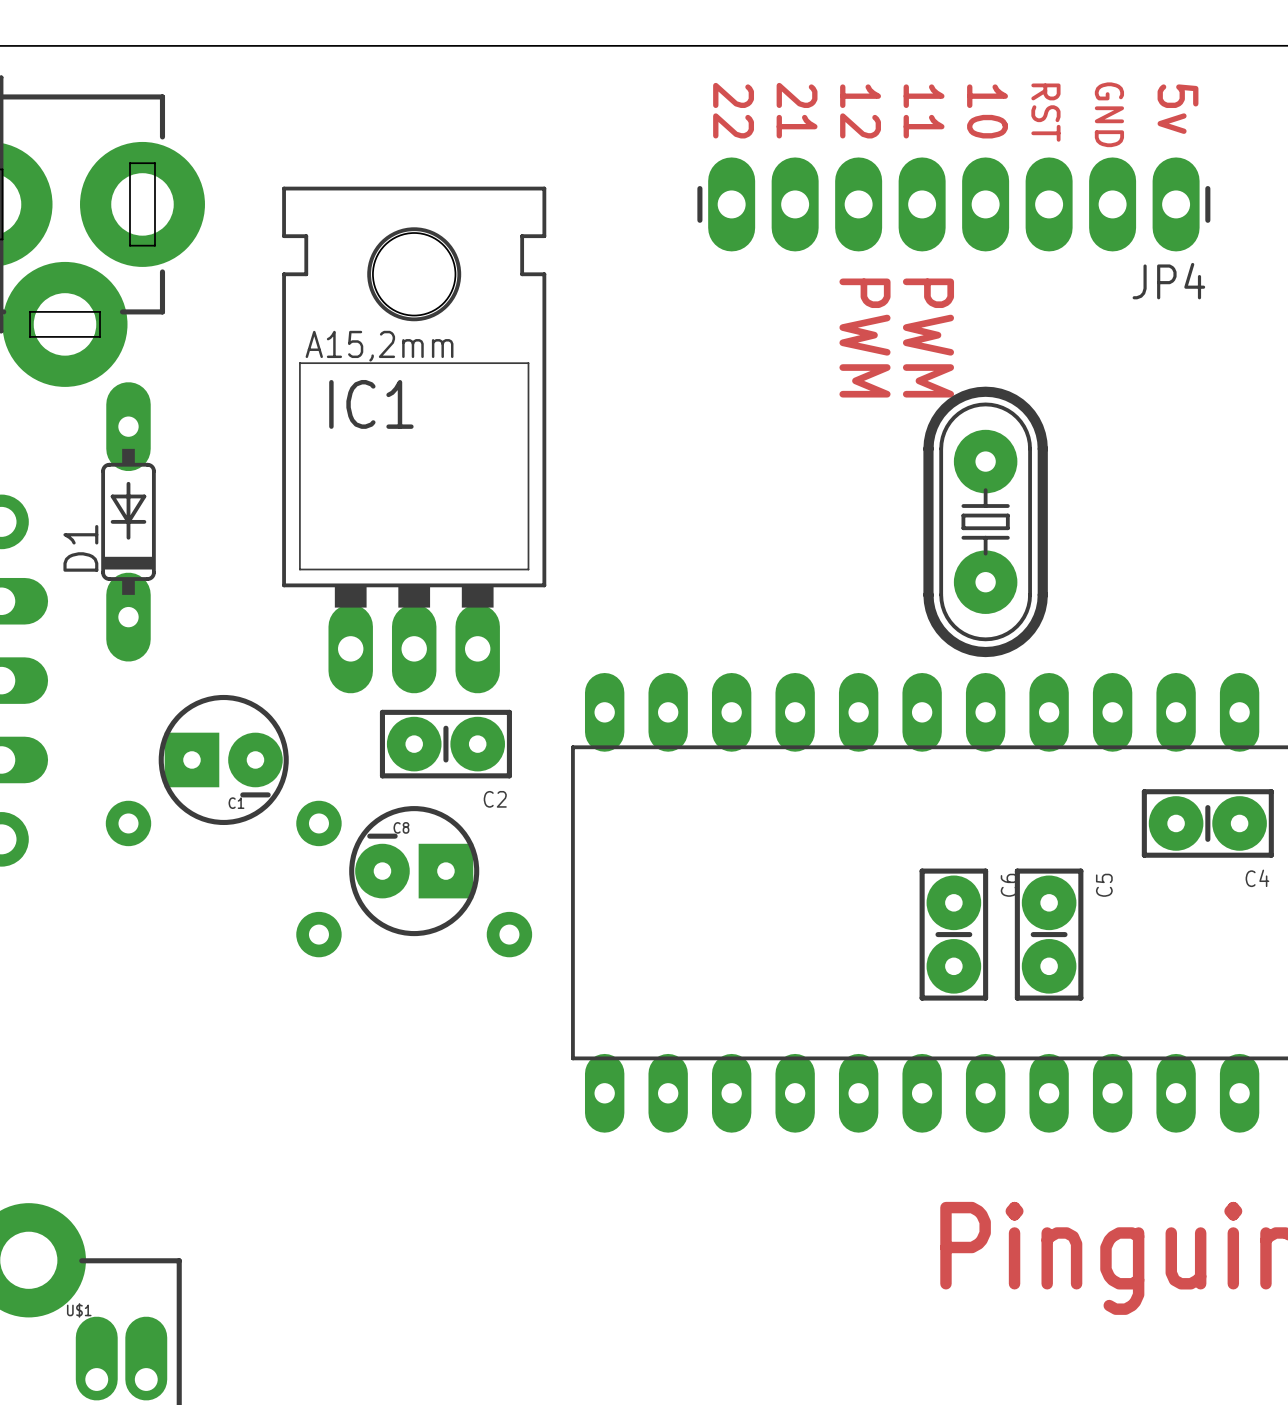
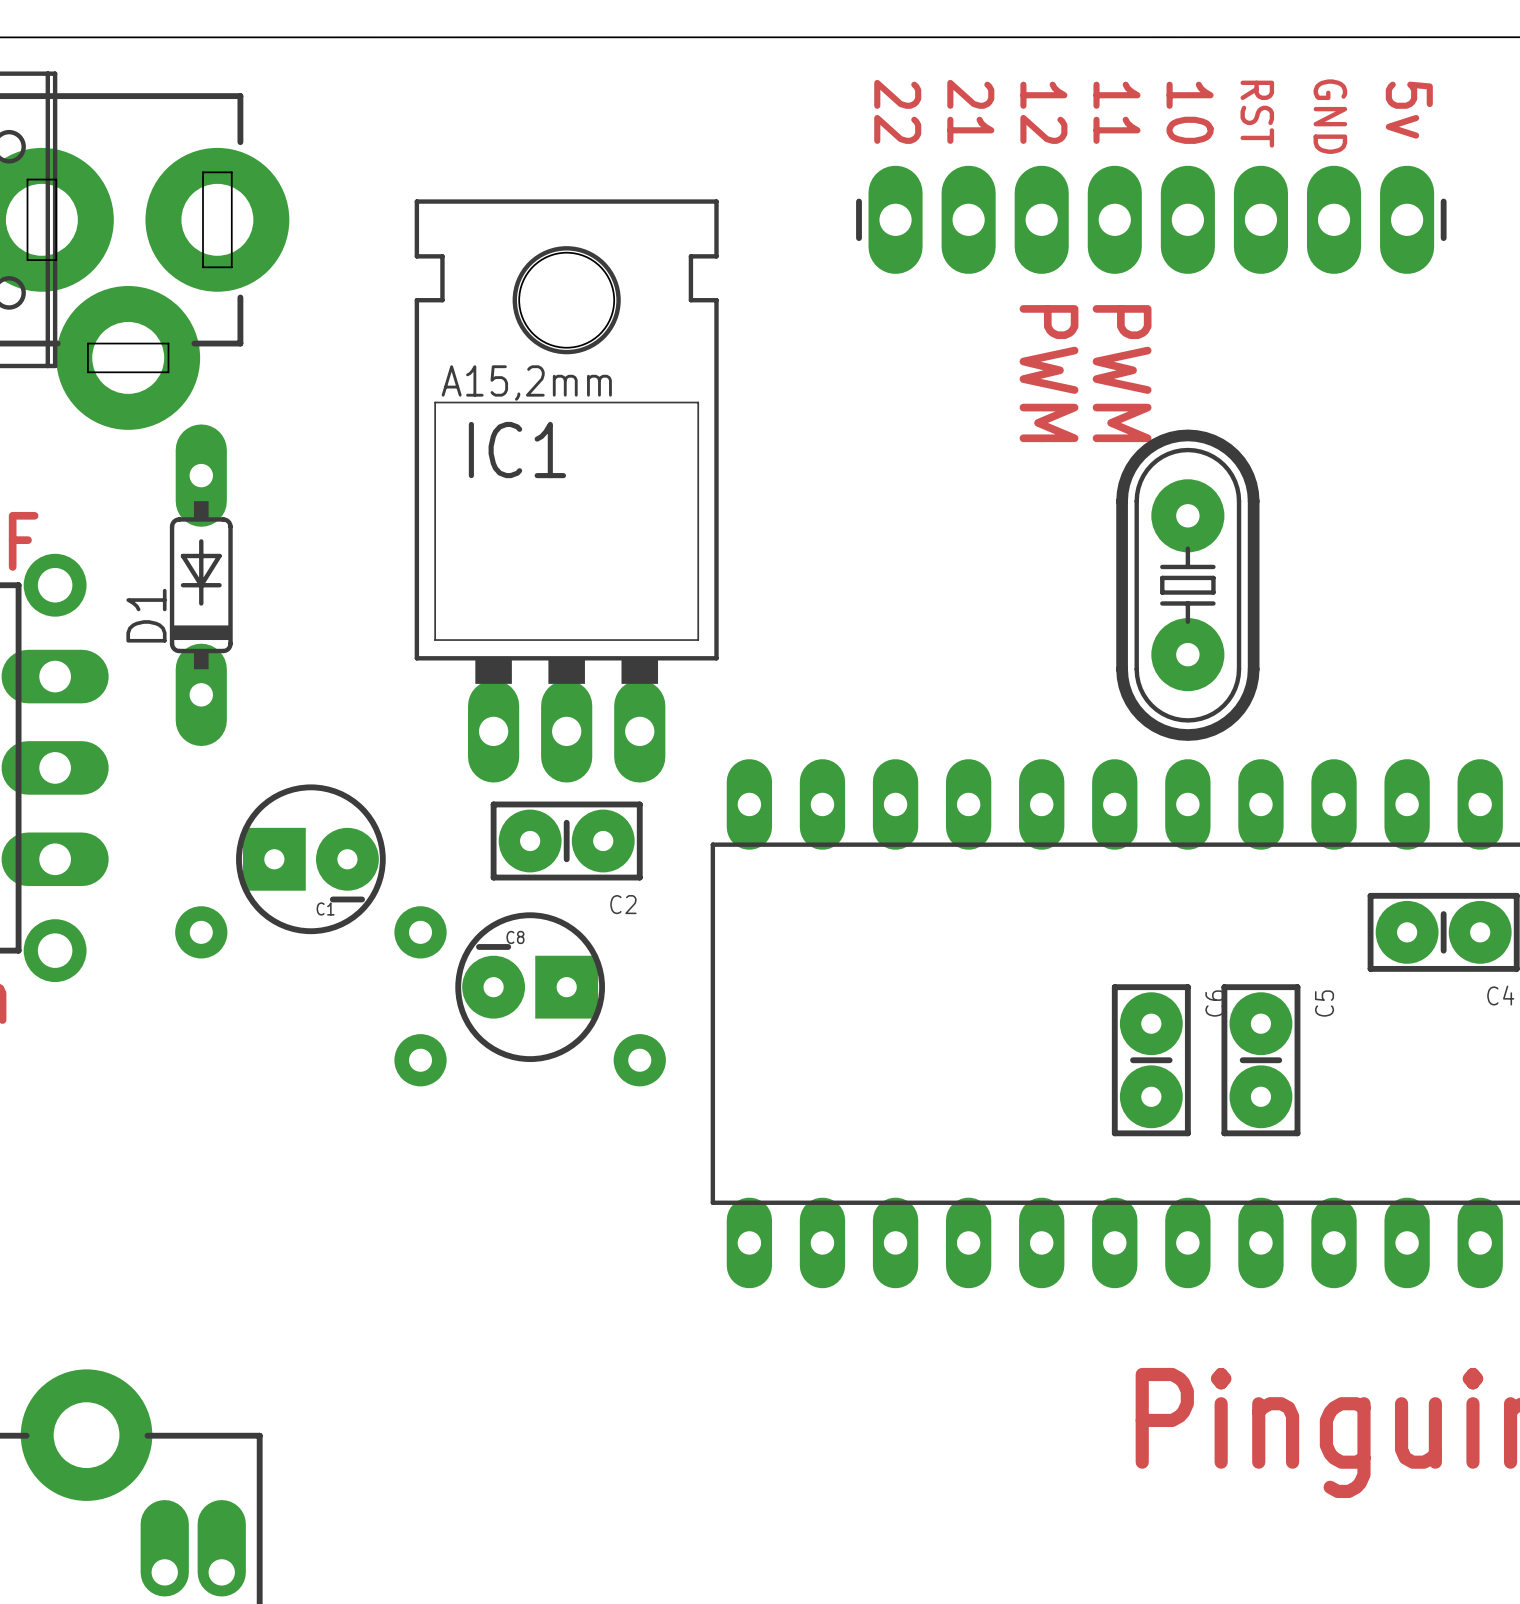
JP4 name: JP4 (1168, 281) -> none
IC1 position: (414, 439) -> (566, 490)
U$1 name: U$1 (79, 1310) -> none

